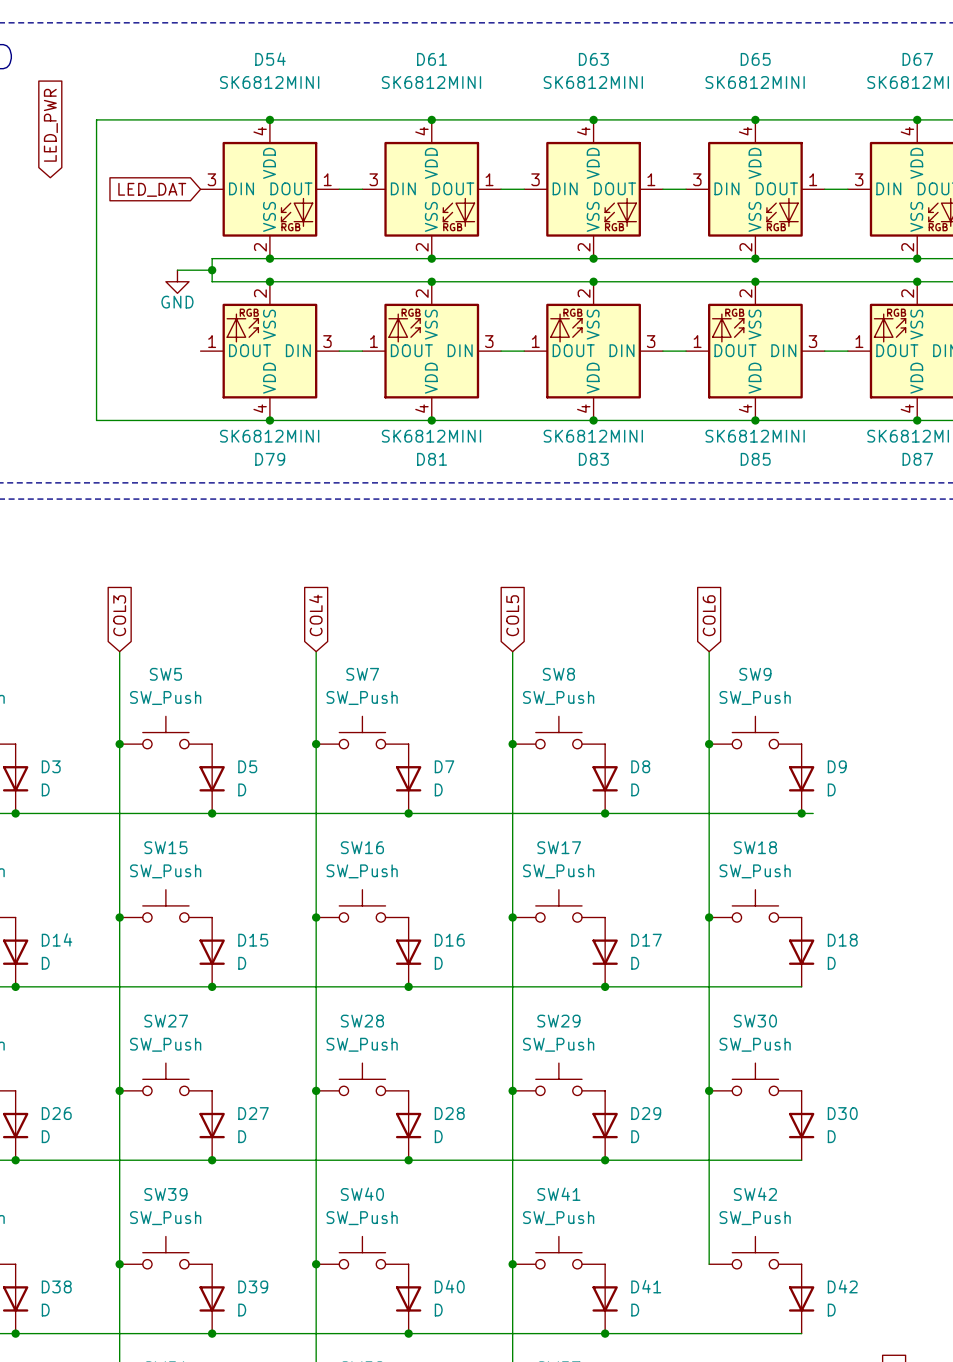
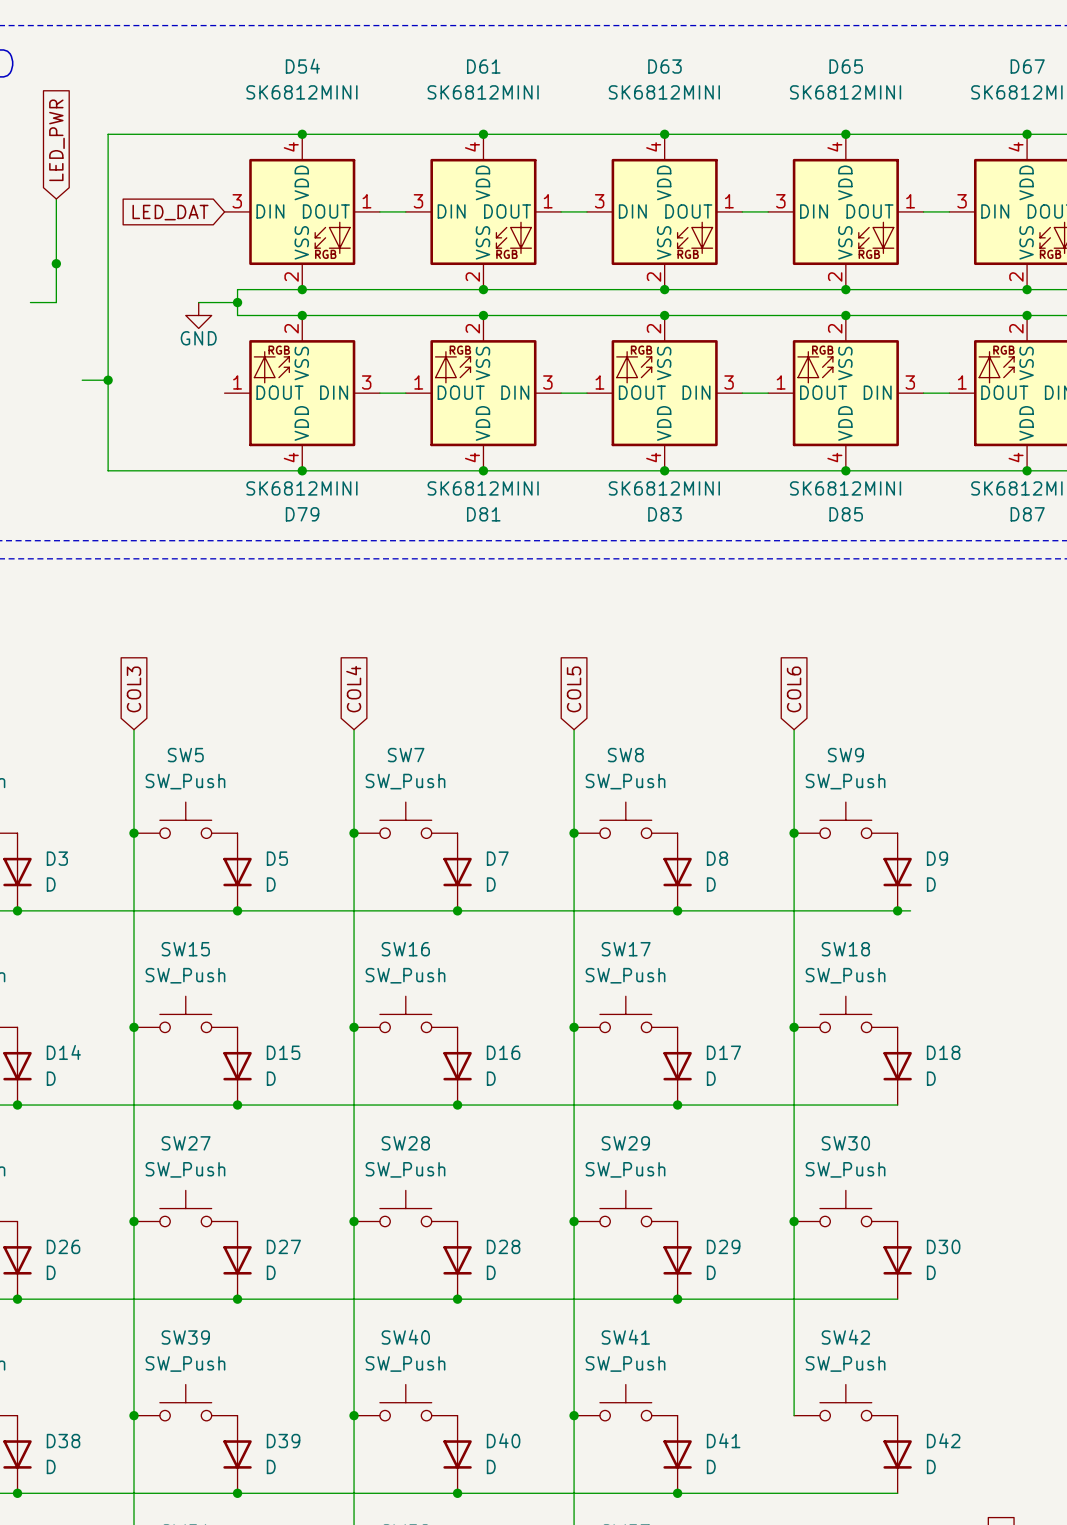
wire: none -> (56, 199) (56, 302) (30, 302)
junction: none -> (56, 263)
wire: none -> (82, 380) (108, 380)
junction: none -> (108, 380)

